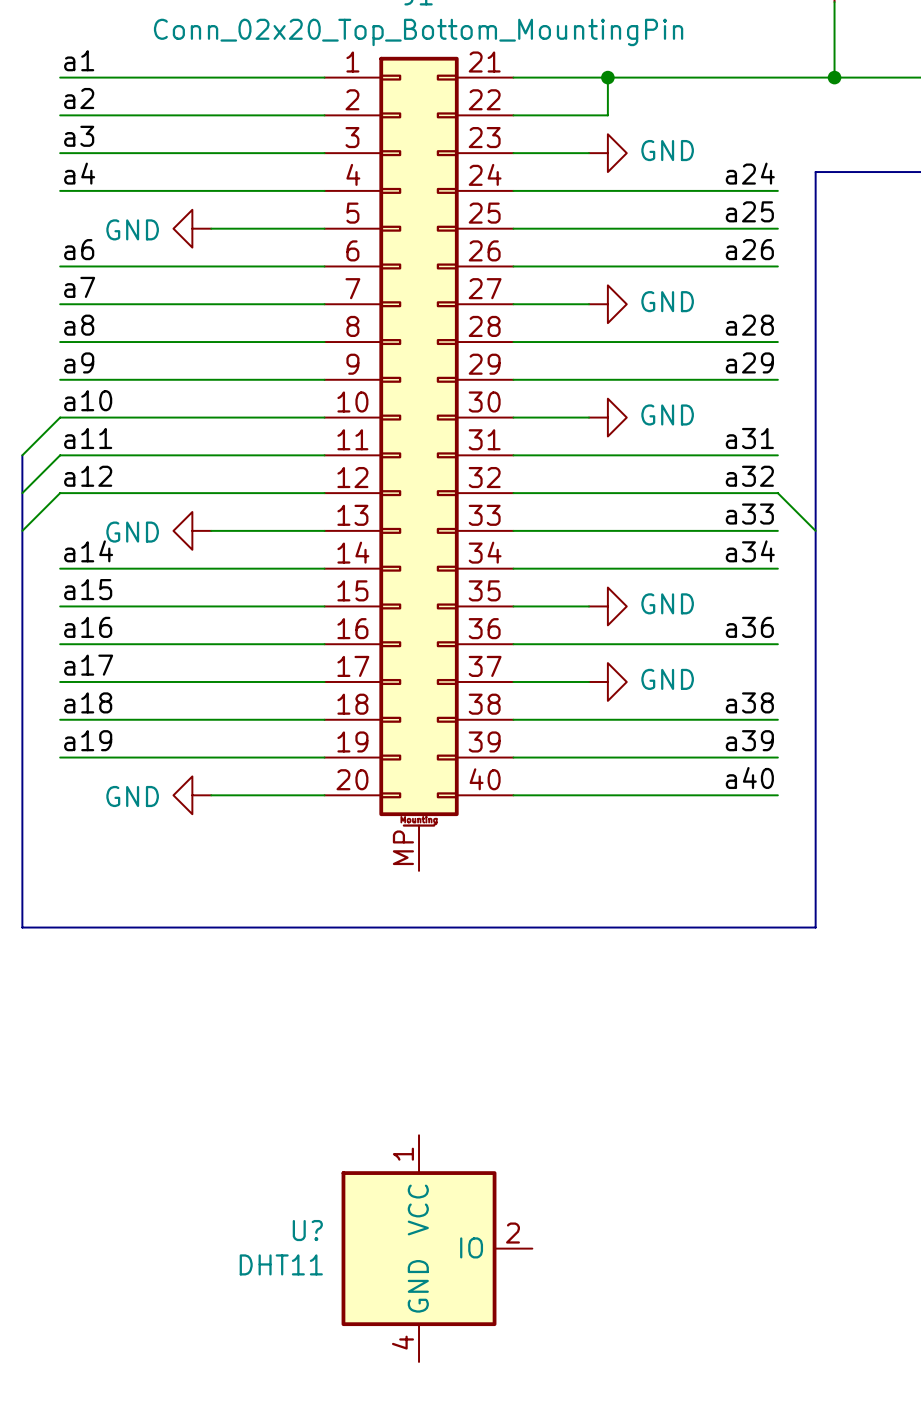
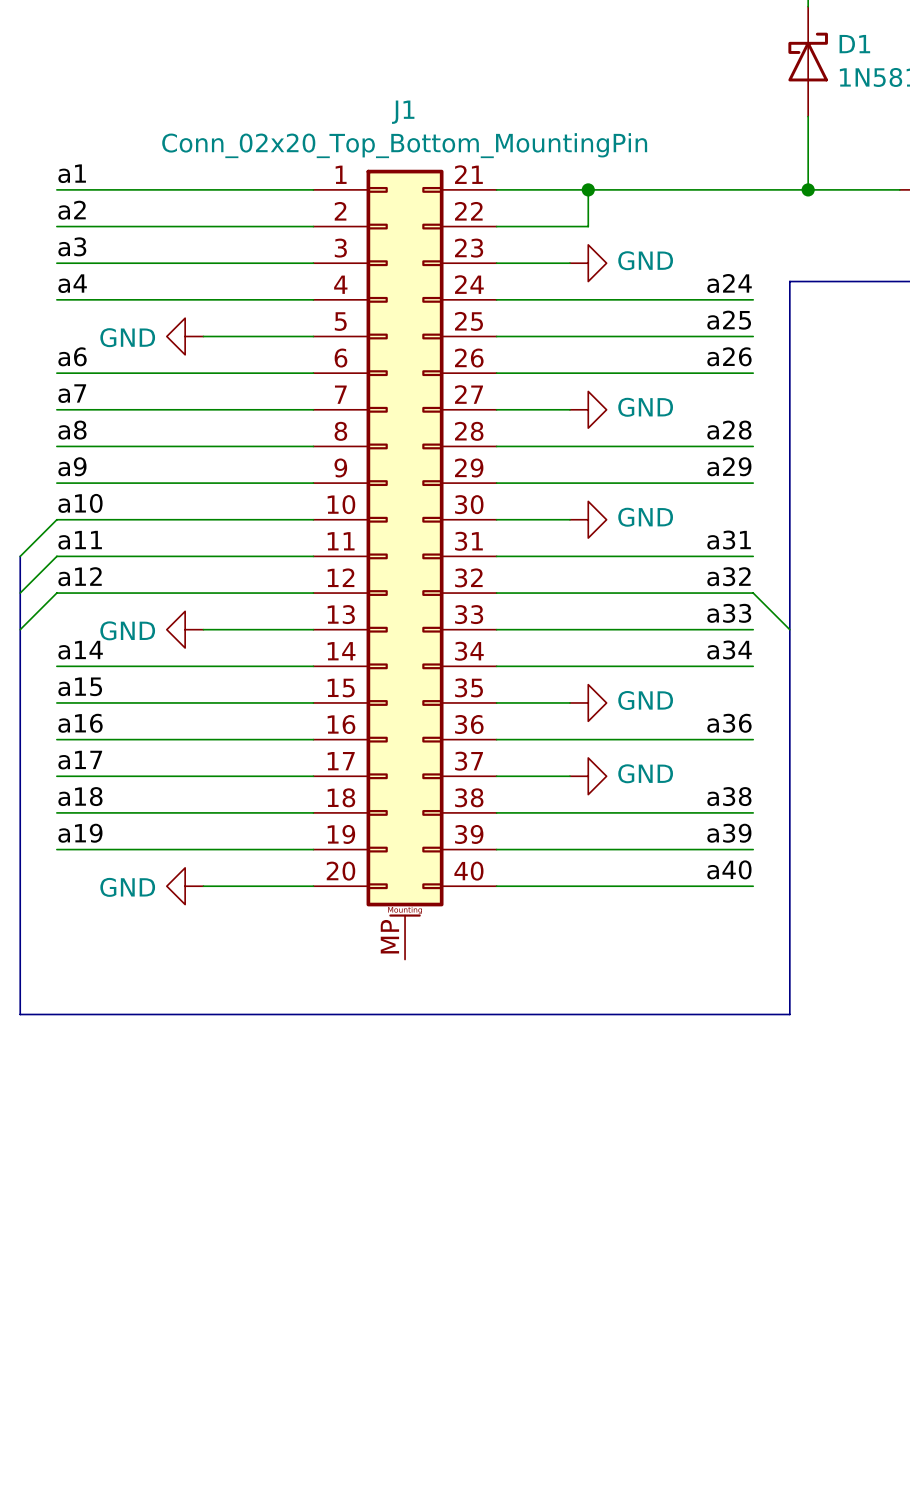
U?: DHT11 (436, 1248) -> none

